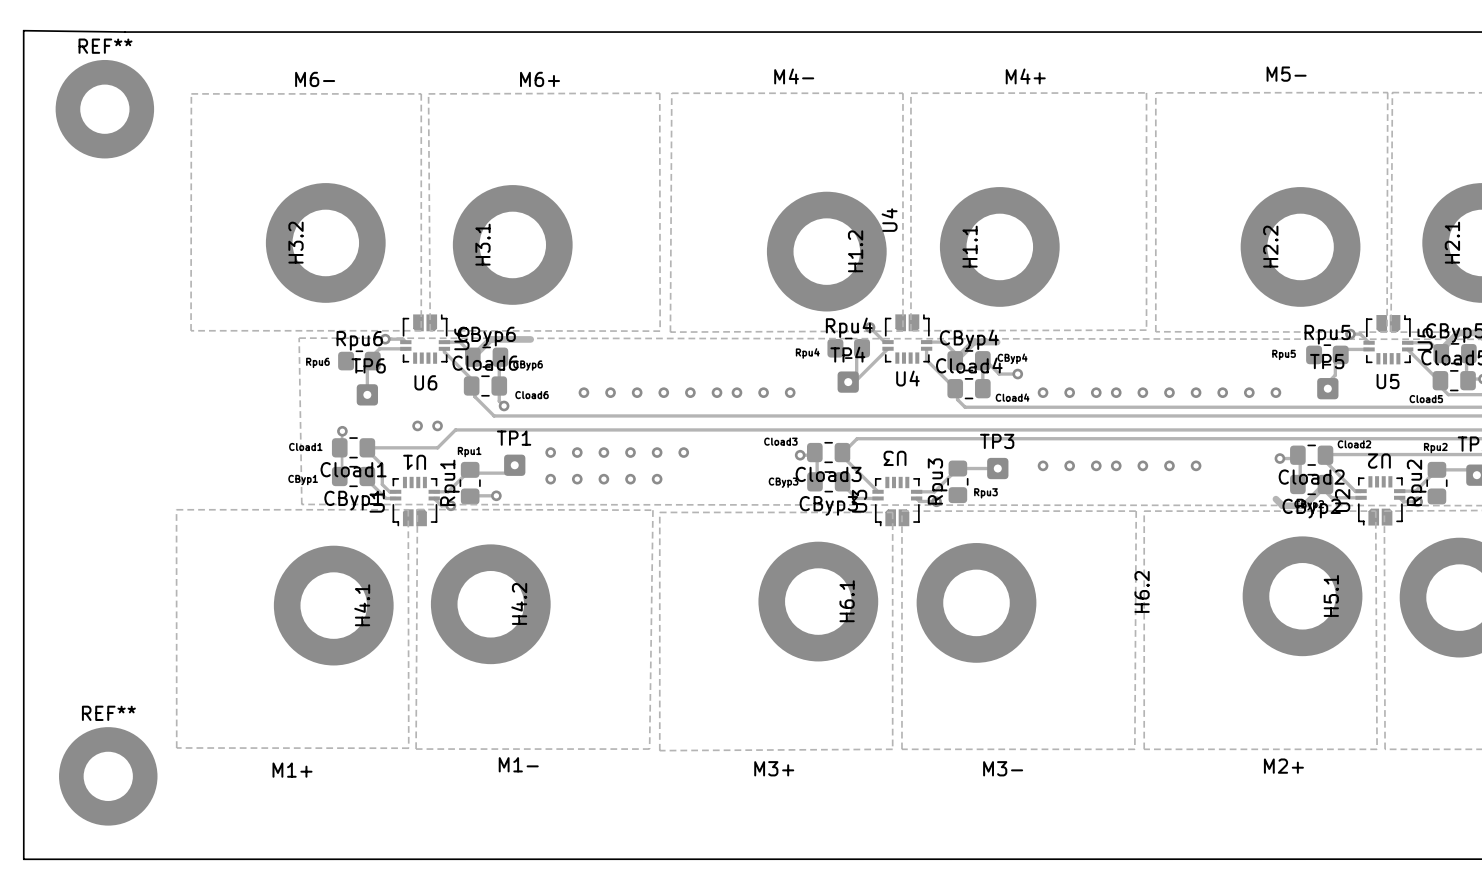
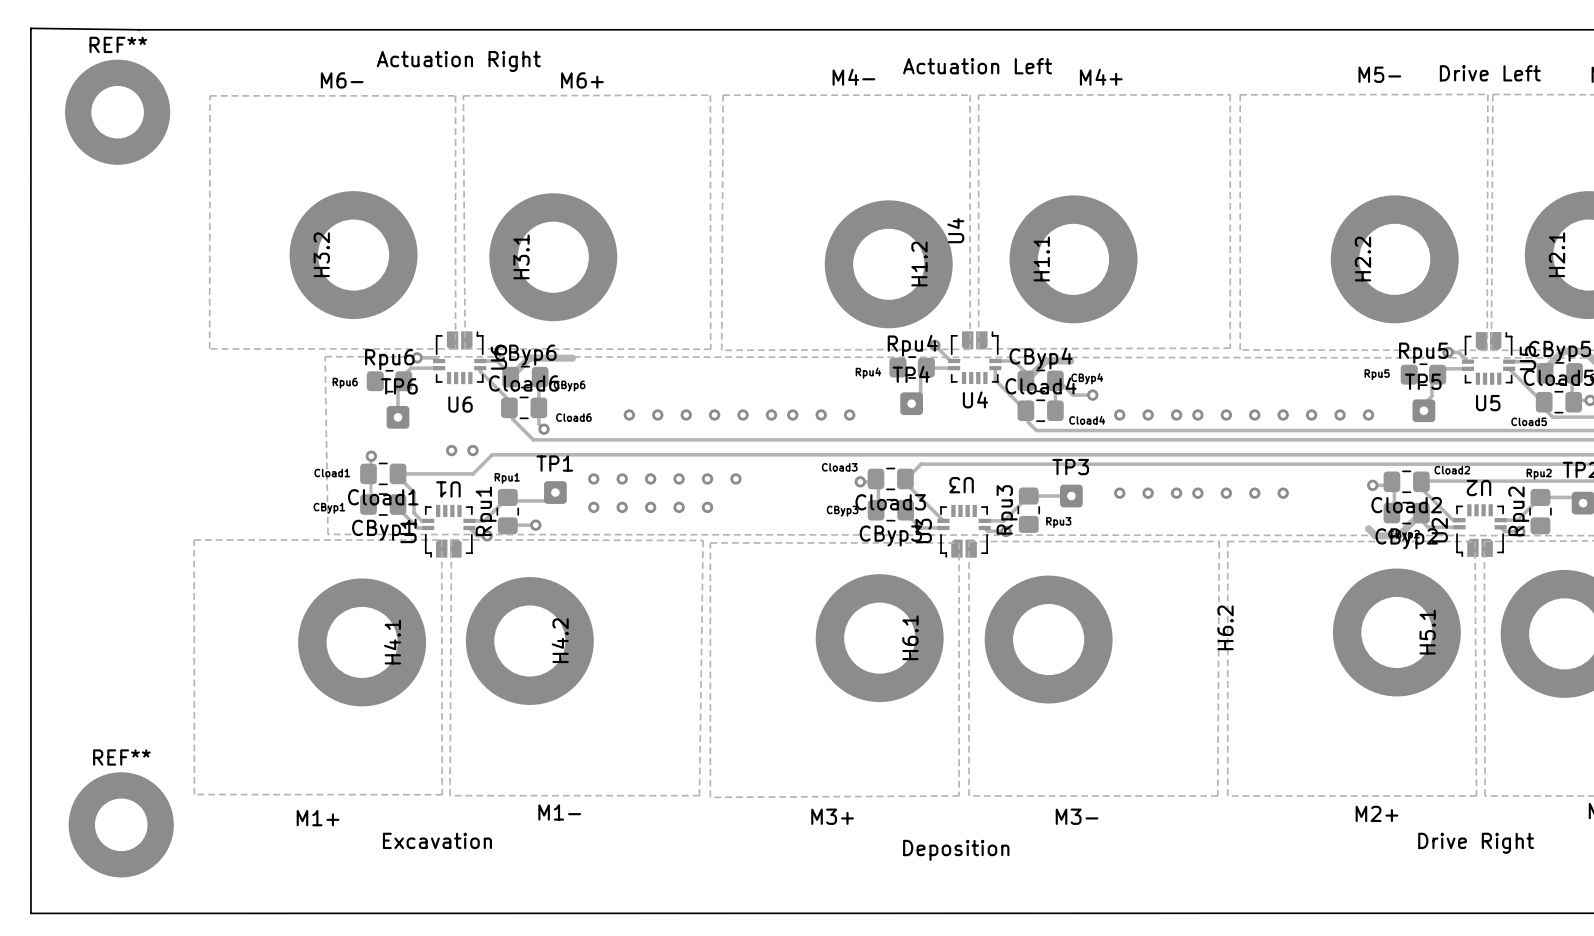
text: none -> Actuation Right (458, 61)
text: none -> Actuation Left (977, 66)
text: none -> Drive Left (1490, 73)
track: (888, 348) (854, 382) -> (954, 368) (926, 367)
text: none -> Excavation (437, 840)
text: none -> Drive Right (1476, 843)
text: none -> Deposition (956, 850)

